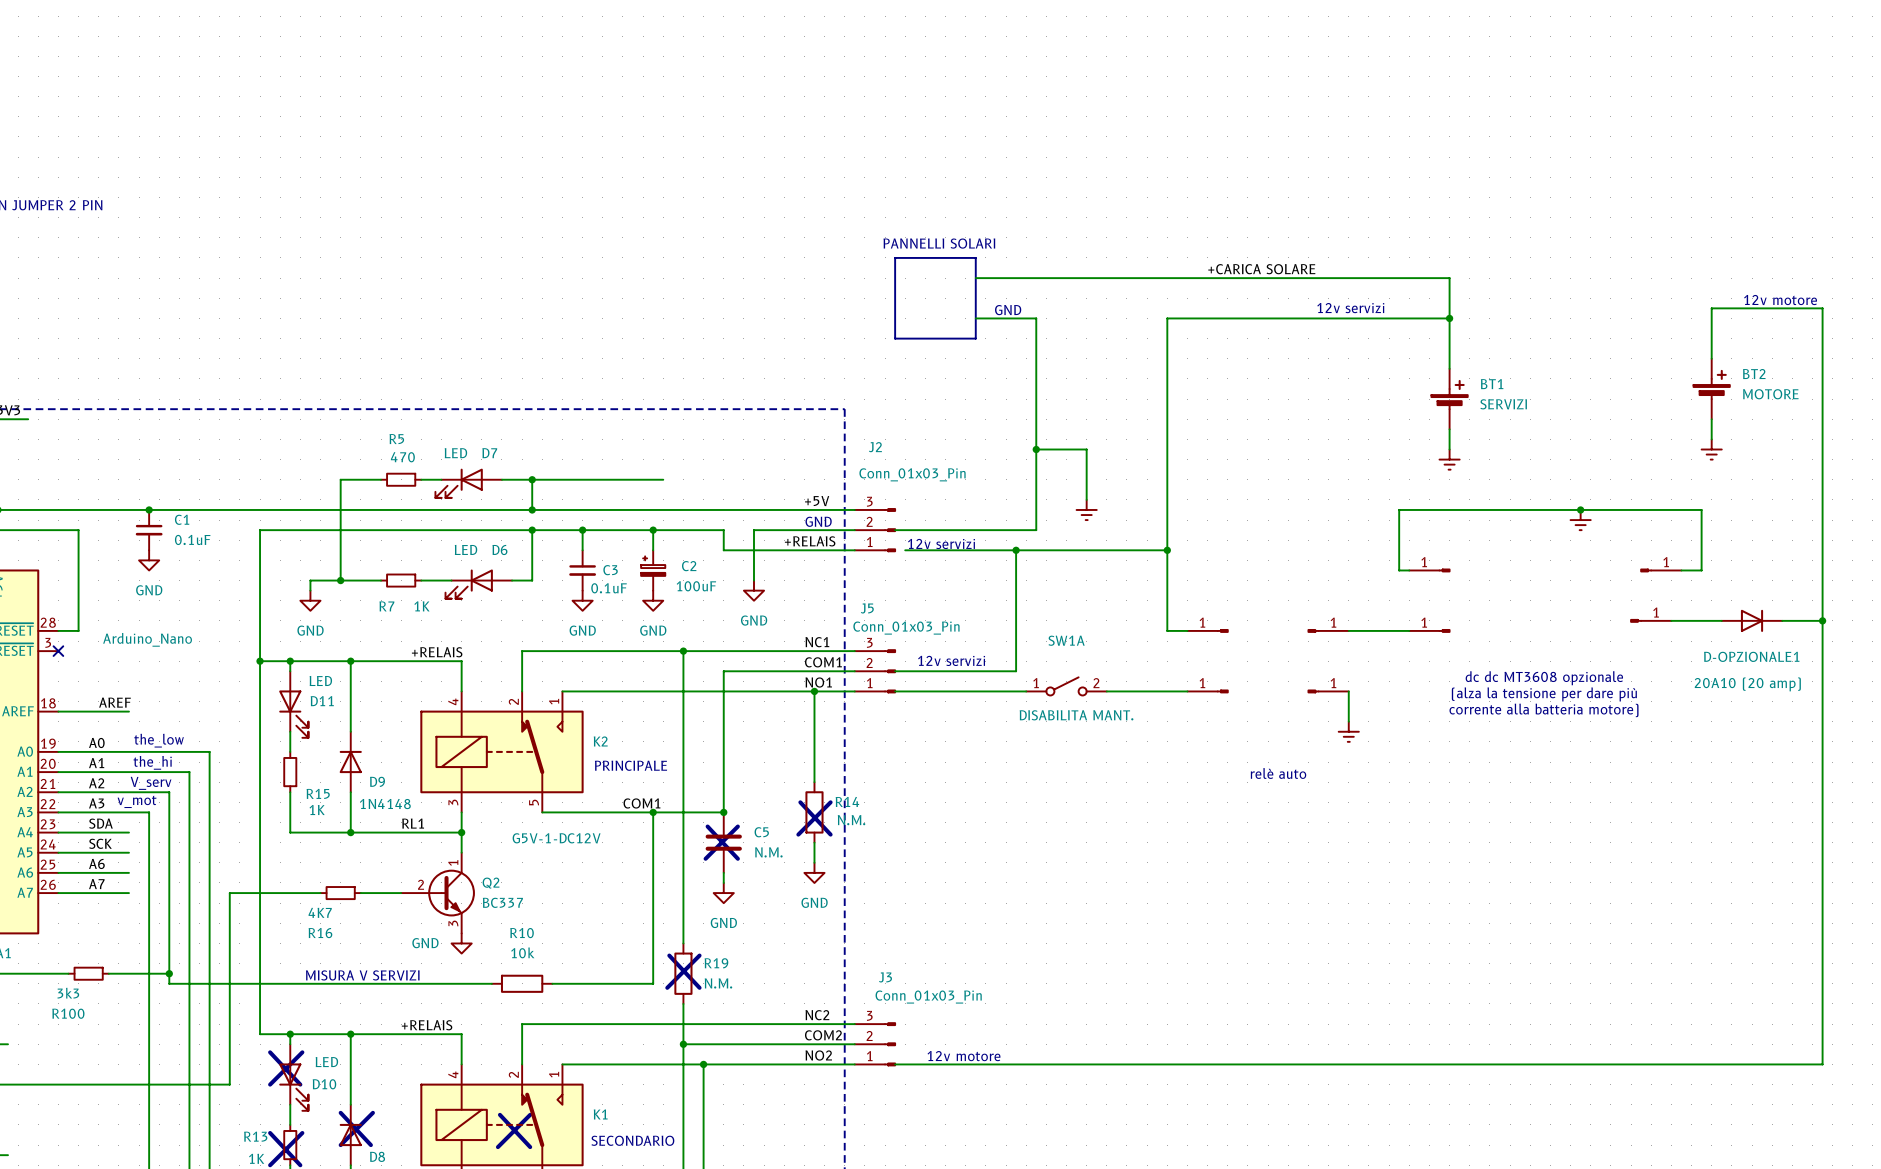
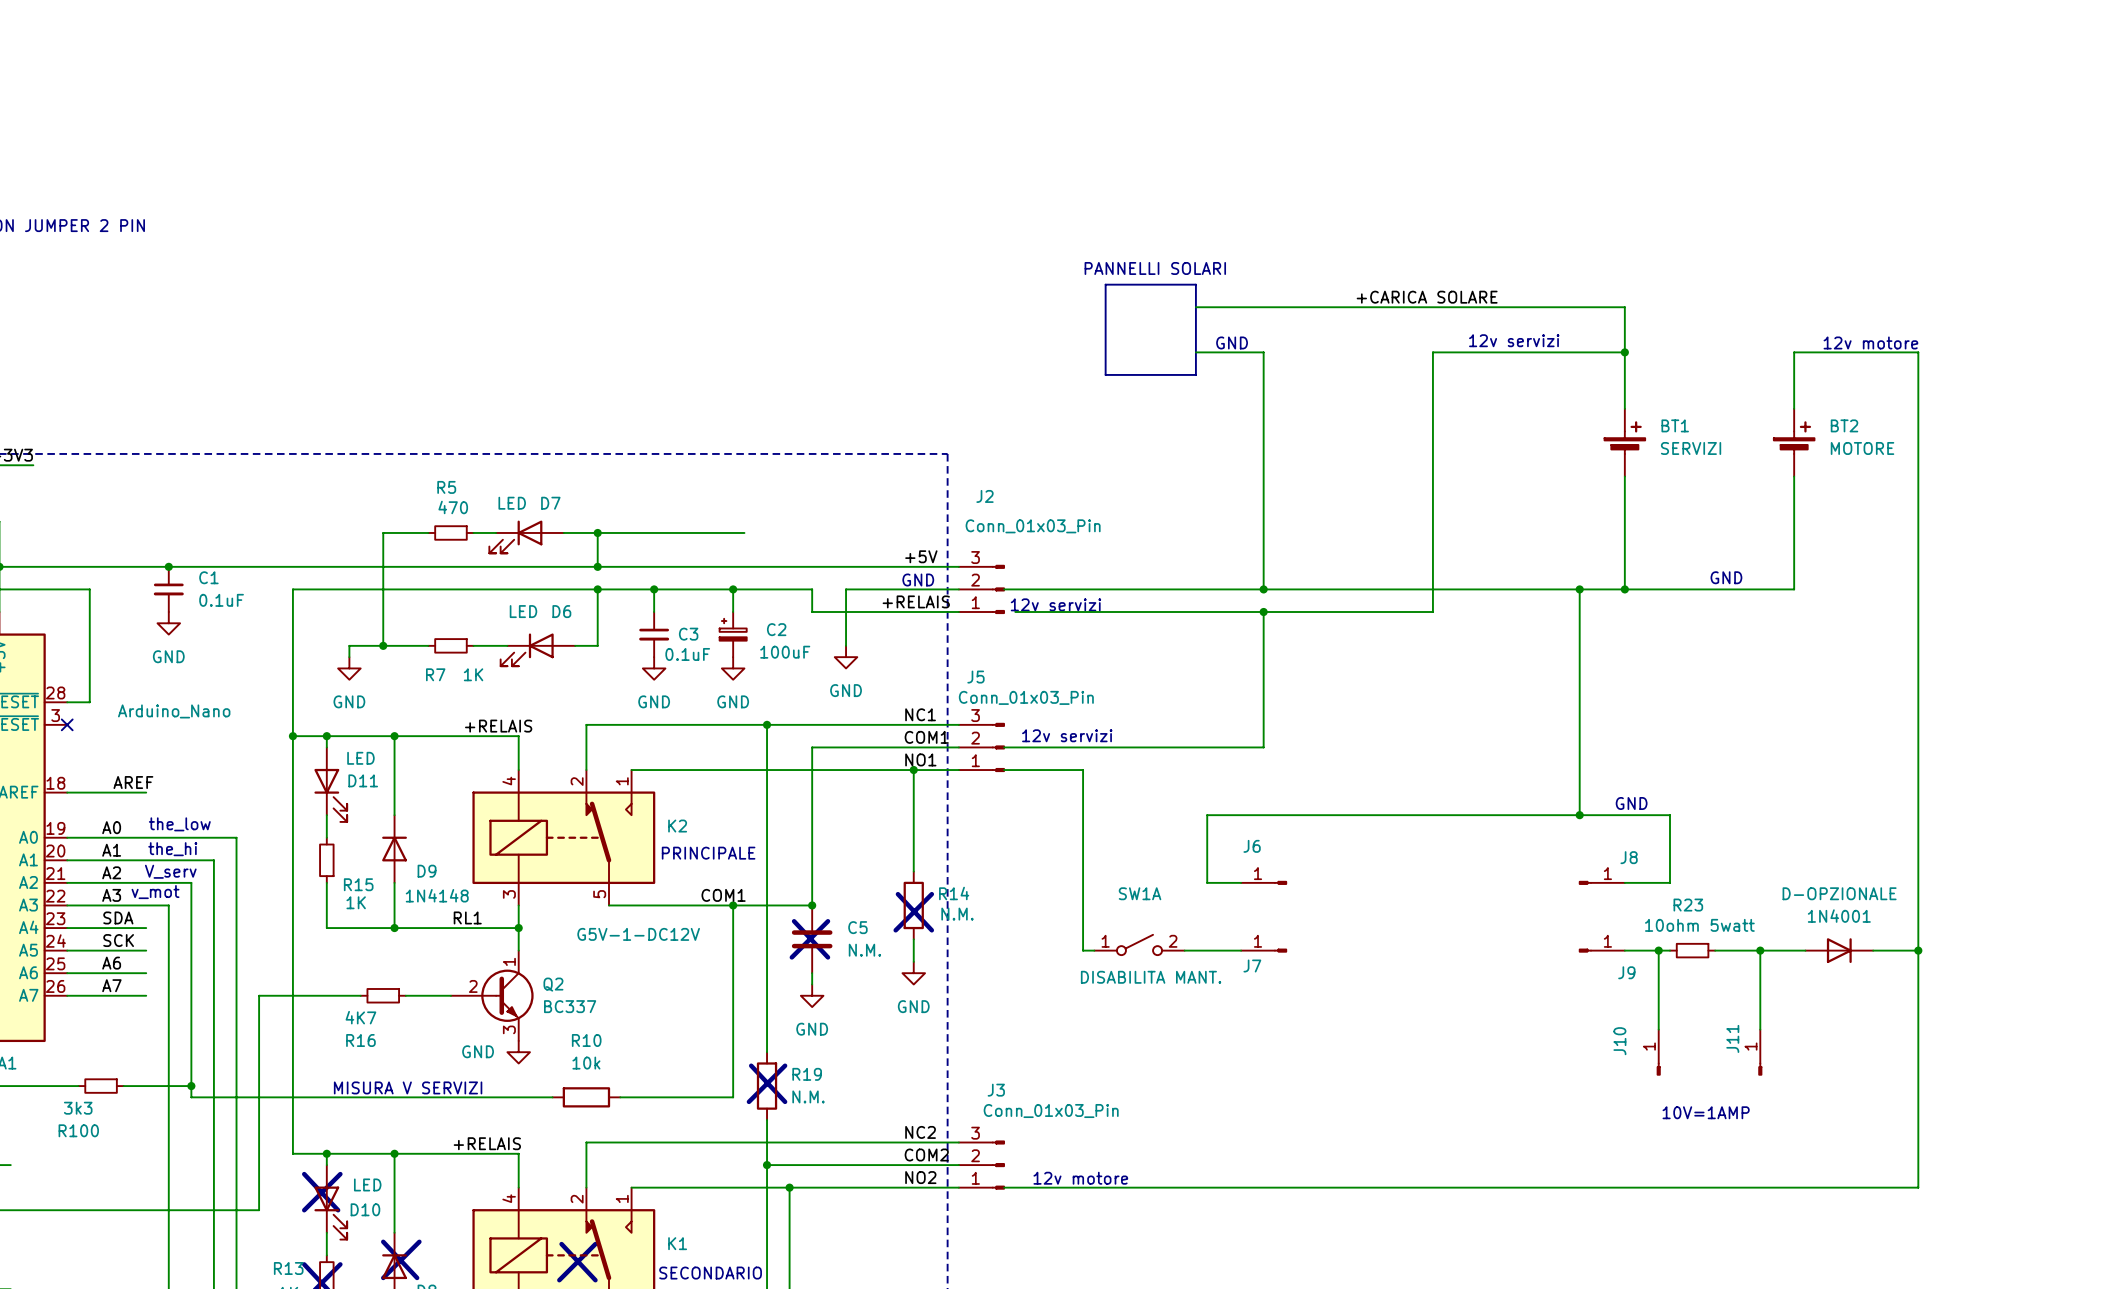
text position: PANNELLI SOLARI (939, 243) -> PANNELLI SOLARI (1155, 268)
line: (895, 257) (975, 257) (975, 338) (895, 338) (895, 257) -> (1105, 284) (1195, 284) (1195, 374) (1105, 374) (1105, 284)
wire: (975, 278) (1066, 278) -> none
text position: 12v motore (1780, 300) -> 12v motore (1870, 342)
text position: GND (1008, 310) -> GND (1232, 342)
wire: (975, 318) (1036, 318) (1036, 530) -> (1794, 476) (1794, 589) (1162, 589)
wire: none -> (1195, 352) (1263, 352) (1263, 589)
wire: (1278, 318) (1167, 318) (1167, 630) (1187, 630) -> (1432, 352) (1432, 612) (1308, 612)
wire: (1711, 318) (1711, 308) (1822, 308) (1822, 1064) (1711, 1064) -> (1918, 487) (1918, 1187)
wire: none -> (1918, 352) (1794, 352) (1794, 408)
BT2 position: (1711, 389) -> (1794, 442)
wire: (1036, 449) (1086, 449) (1086, 499) -> none
junction: (1036, 449) -> none
wire: none -> (1624, 499) (1624, 589)
power symbol: (1711, 449) -> none
power symbol: (1449, 459) -> none
power symbol: (1086, 509) -> none
junction: (1580, 509) -> none
text: none -> GND (1726, 577)
power symbol: (1580, 520) -> none
junction: none -> (1263, 589)
wire: none -> (1579, 589) (1579, 815)
junction: none -> (1579, 589)
junction: none -> (1624, 589)
wire: (1016, 550) (1016, 671) -> (1263, 612) (1263, 747) (1139, 747)
junction: (1016, 550) -> none
junction: none -> (1263, 612)
junction: (1167, 550) -> none
wire: (1409, 570) (1399, 570) (1399, 509) (1701, 509) (1701, 570) (1681, 570) -> none
part: (1429, 570) -> none
part: (1660, 570) -> none
part: (1650, 620) -> none
wire: (1671, 620) (1721, 620) -> none
D-OPZIONALE1: 20A10 (20 amp) (1752, 620) -> none
wire: (1782, 620) (1822, 620) -> none
junction: (1822, 620) -> none
part: (1207, 630) -> none
part: (1328, 630) -> none
wire: (1348, 630) (1409, 630) -> none
part: (1429, 630) -> none
text: dc dc MT3608 opzionale (1544, 678) -> none
SW1A position: (1066, 686) -> (1139, 944)
wire: (965, 691) (1026, 691) -> (1083, 770) (1083, 950) (1094, 950)
wire: (1106, 691) (1187, 691) -> none
part: (1207, 691) -> none
part: (1328, 691) -> none
wire: (1348, 691) (1348, 721) -> none
text: (alza la tensione per dare più (1544, 694) -> none
text: corrente alla batteria motore) (1544, 710) -> none
text: none -> GND (1631, 803)
power symbol: (1348, 731) -> none
junction: none -> (1579, 815)
text: relè auto (1278, 773) -> none
wire: none -> (1241, 882) (1207, 882) (1207, 815) (1670, 815) (1670, 882) (1624, 882)
J6: none -> (1264, 882)
J8: none -> (1601, 882)
wire: none -> (1184, 950) (1241, 950)
J7: none -> (1264, 950)
J9: none -> (1601, 950)
wire: none -> (1624, 950) (1670, 950)
wire: none -> (1658, 950) (1658, 1029)
junction: none -> (1658, 950)
R23: none -> 10ohm 5watt (1692, 950)
wire: none -> (1715, 950) (1805, 950)
wire: none -> (1760, 950) (1760, 1029)
junction: none -> (1760, 950)
D-OPZIONALE: none -> 1N4001 (1839, 950)
wire: none -> (1873, 950) (1918, 950)
junction: none -> (1918, 950)
J10: none -> (1658, 1052)
J11: none -> (1760, 1052)
text: none -> 10V=1AMP (1706, 1112)

